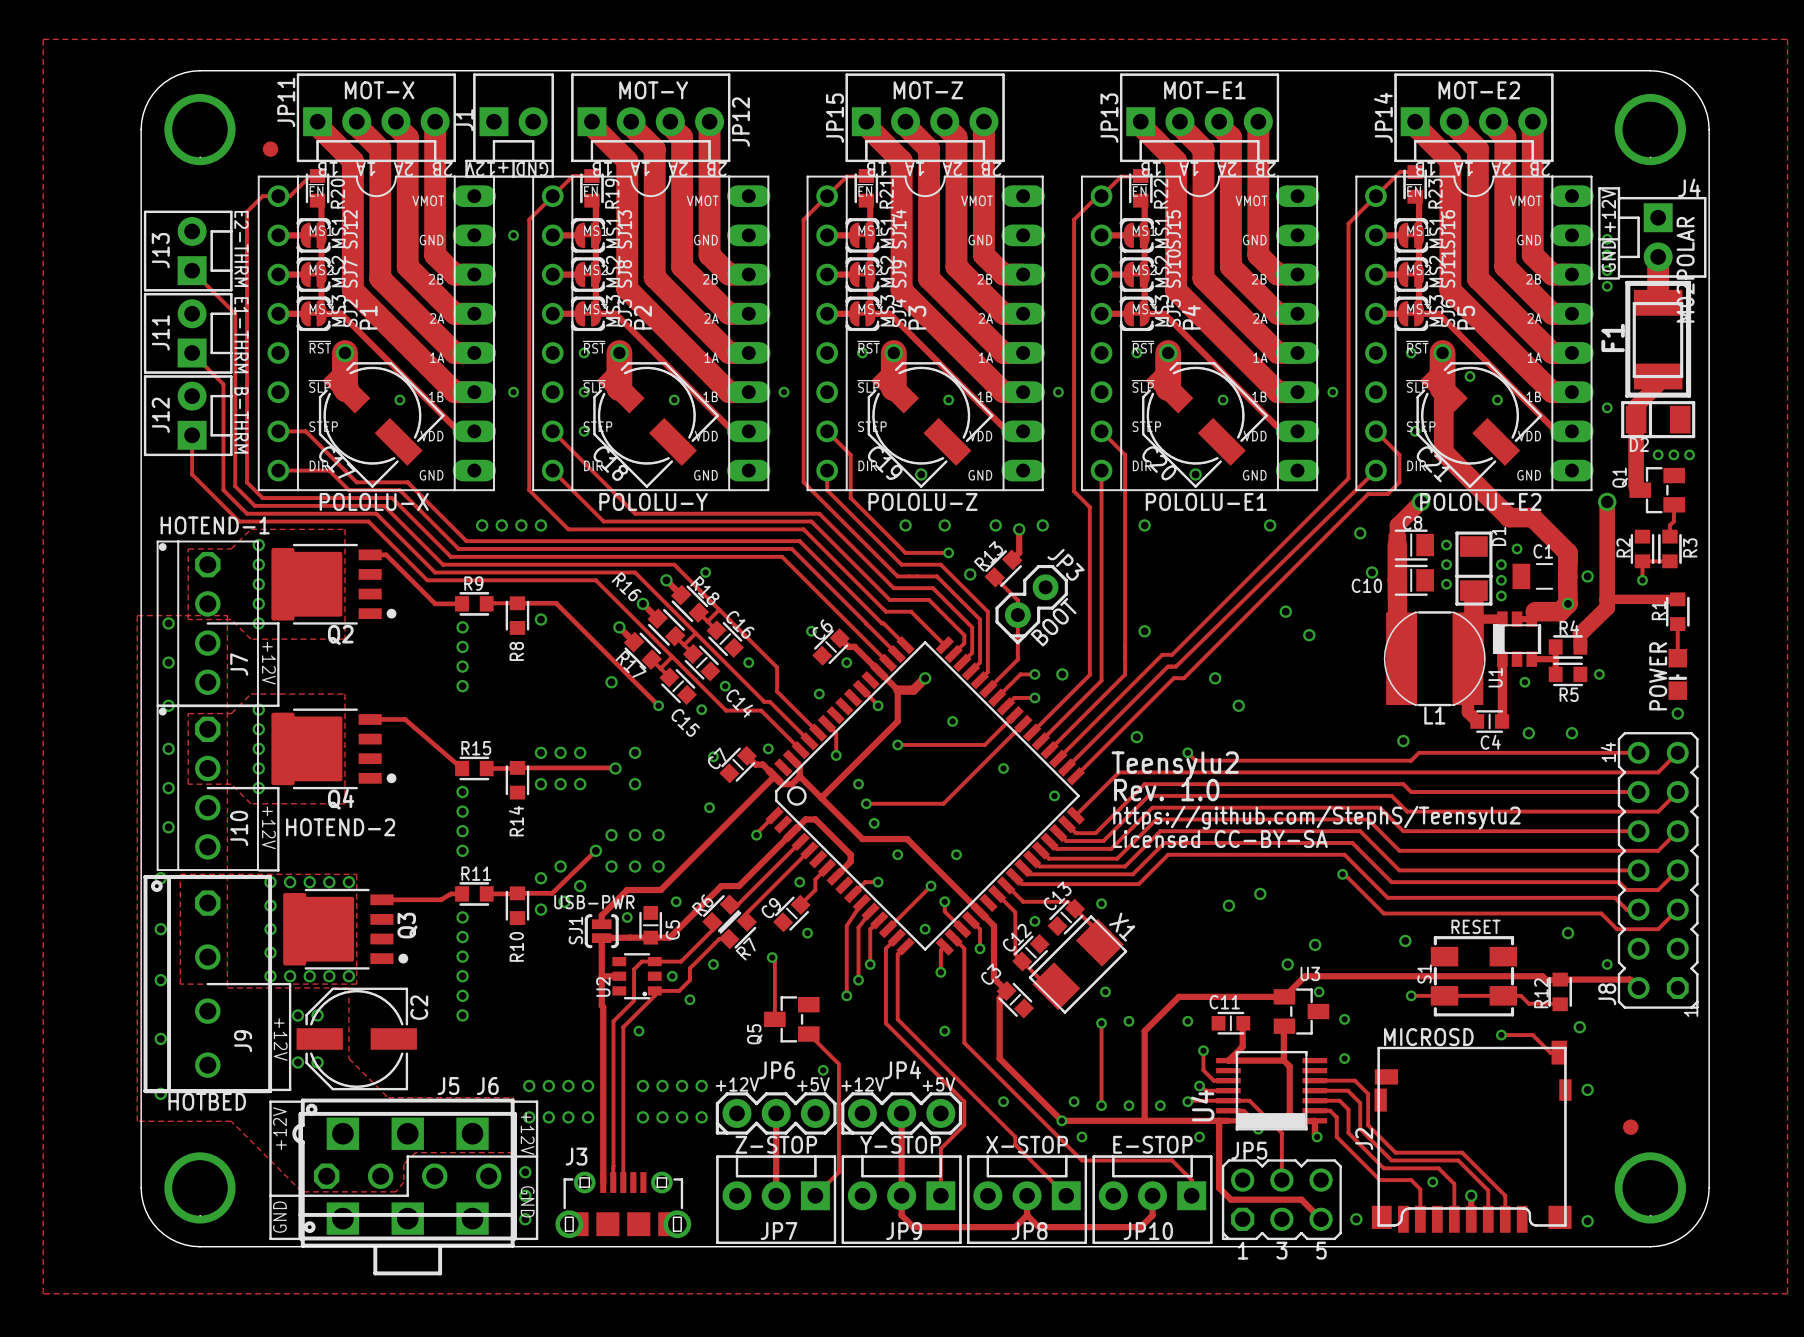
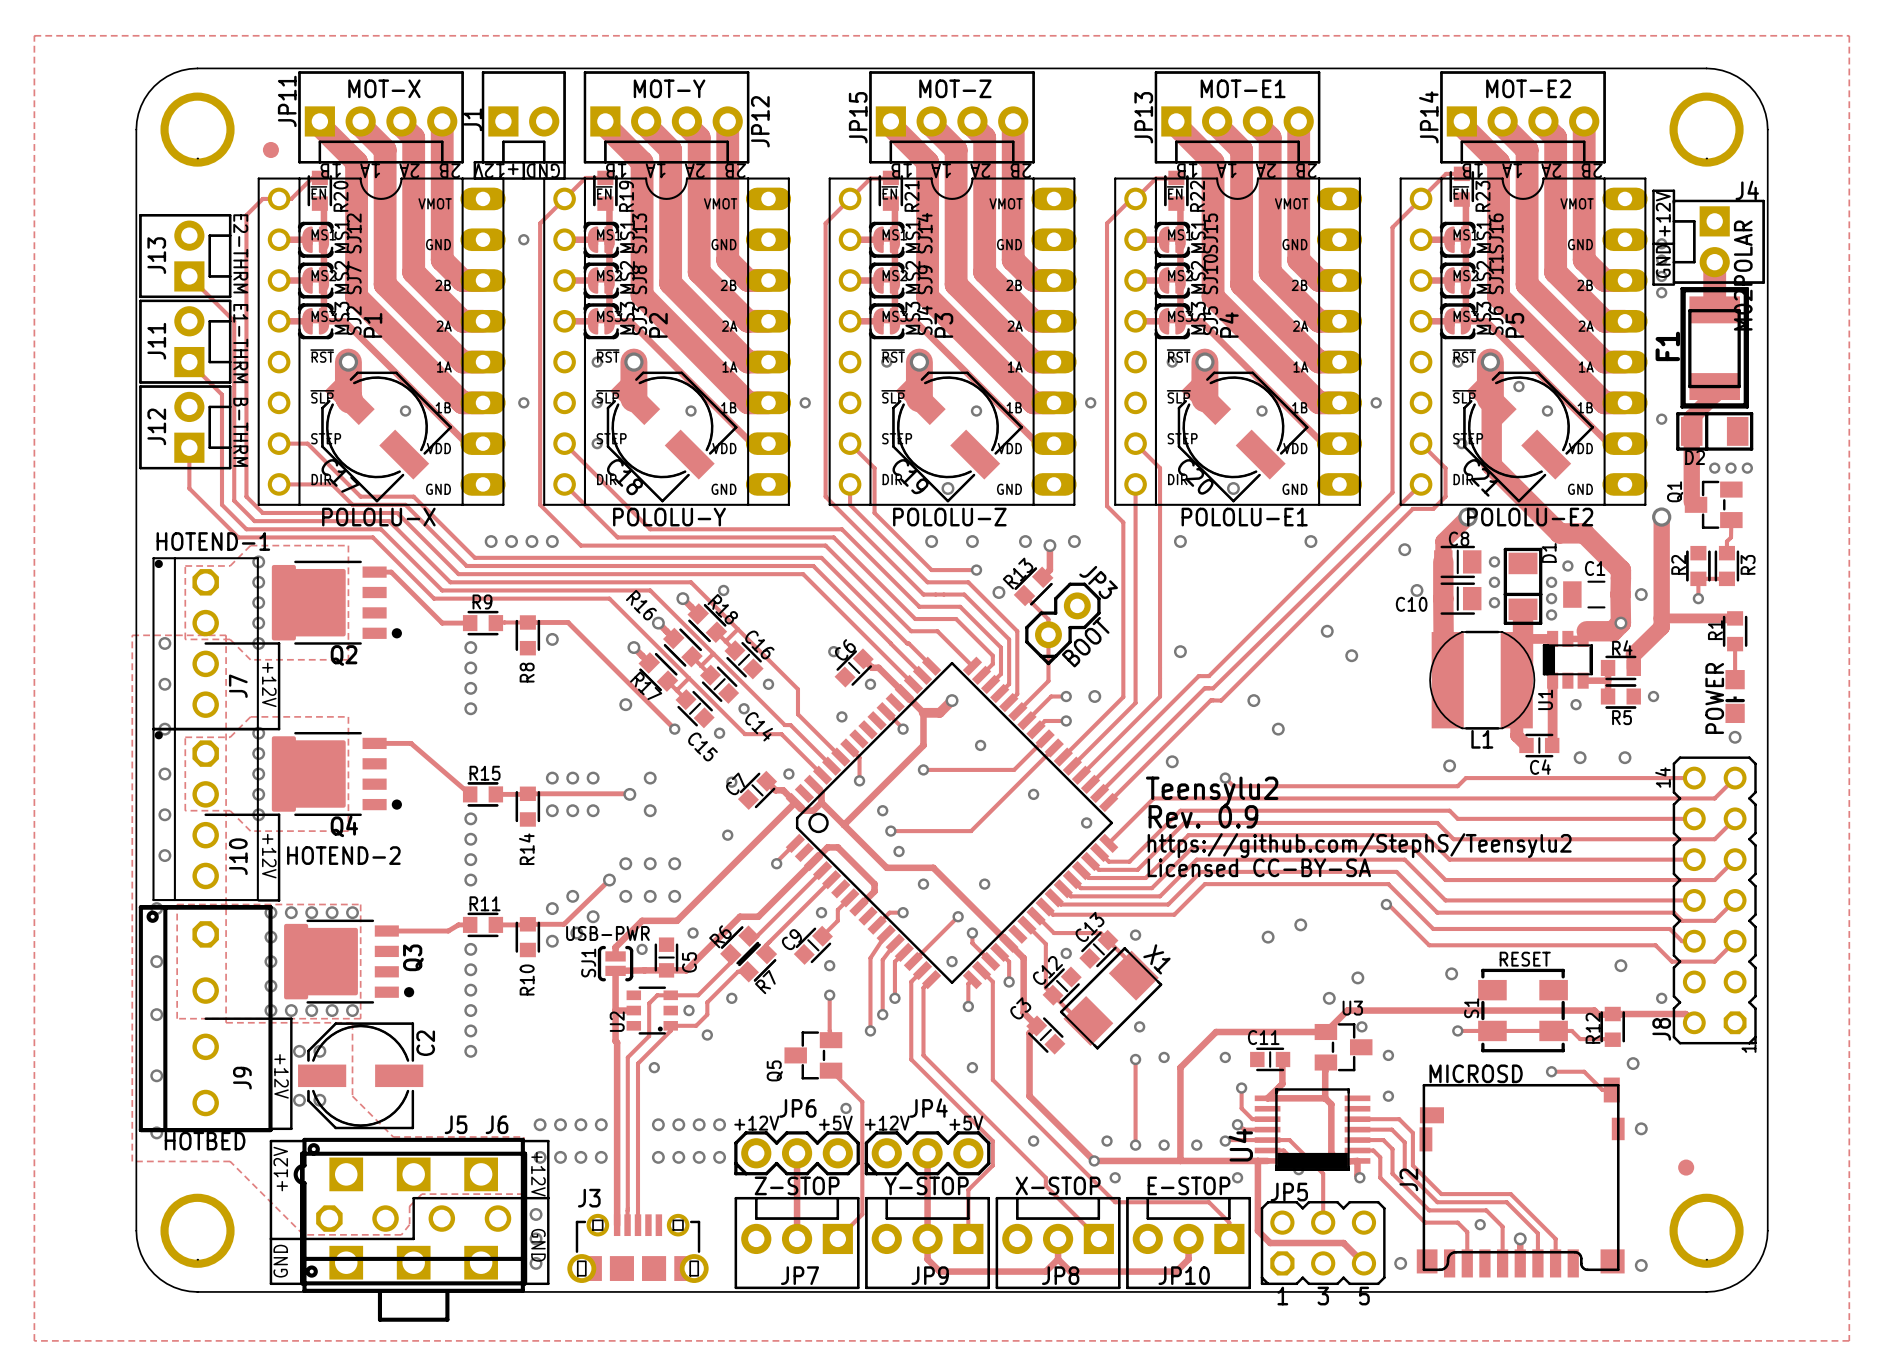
text: Rev. 1.0 (1166, 790) -> Rev. 0.9 (1203, 816)
track: (772, 957) (774, 960) (774, 1019) -> none
via position: (772, 957) -> (829, 995)
track: none -> (829, 995) (829, 1030) (832, 1040) (831, 1040)

